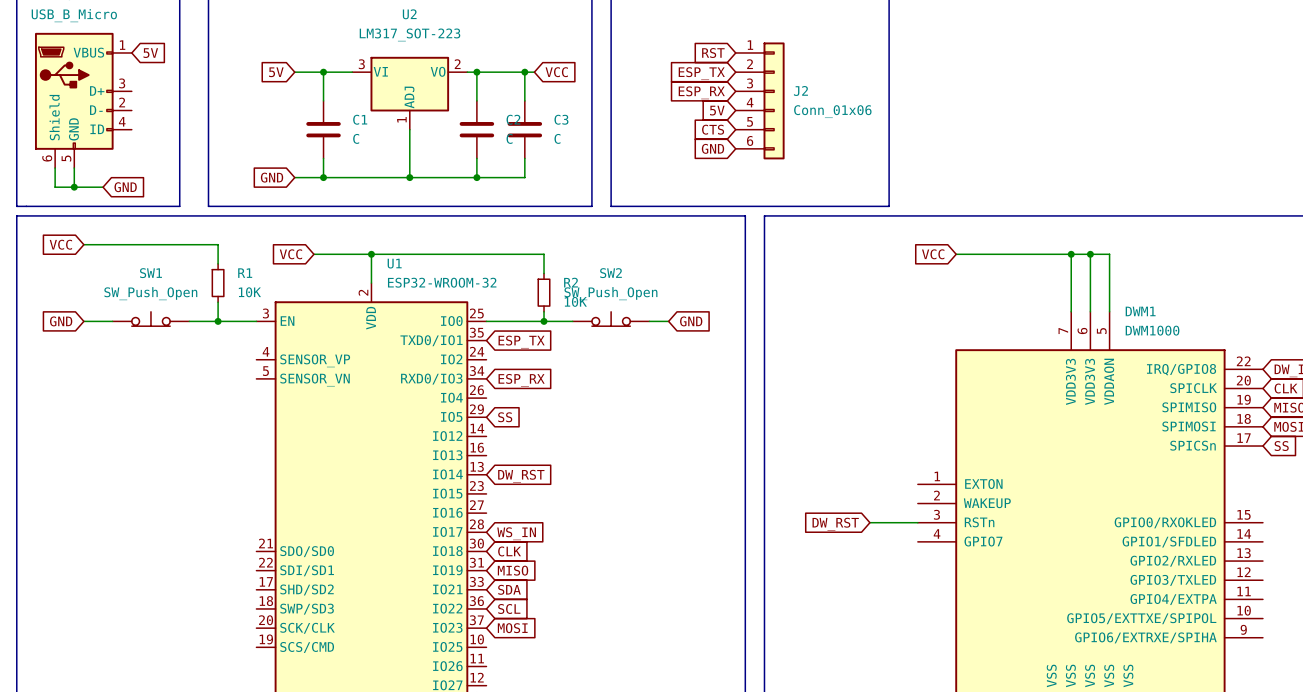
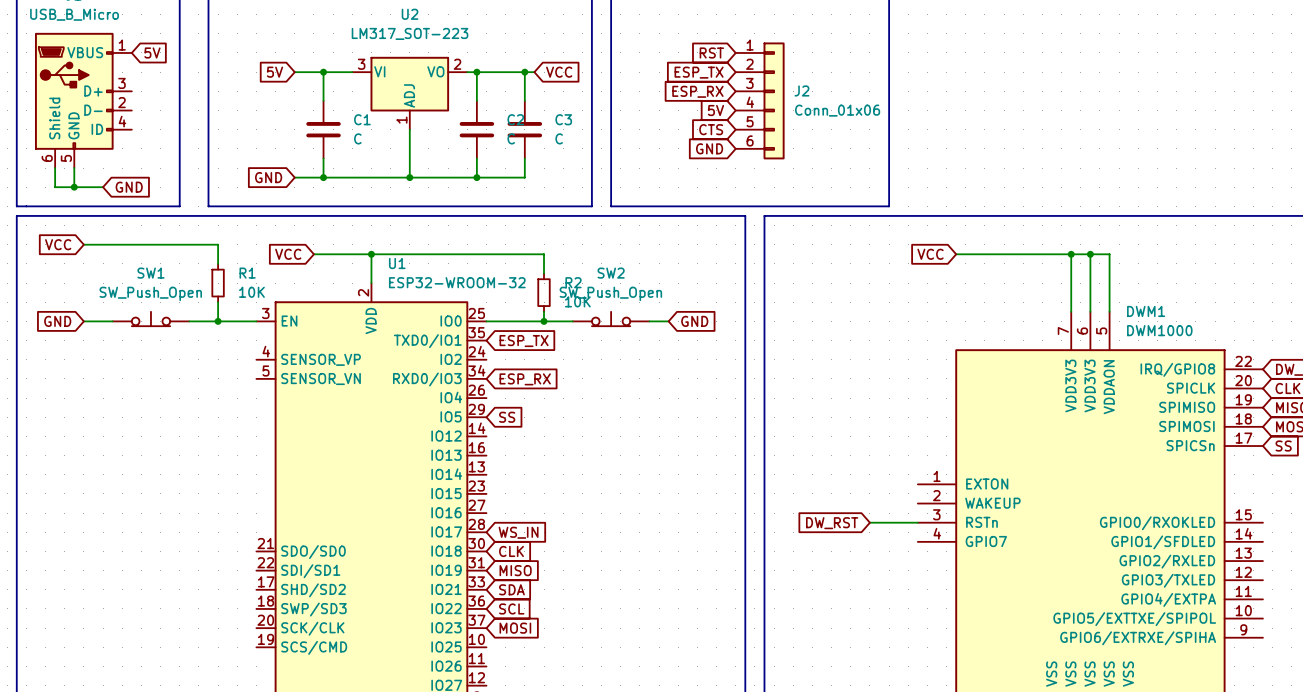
global label: DW_RST (521, 476) -> none

